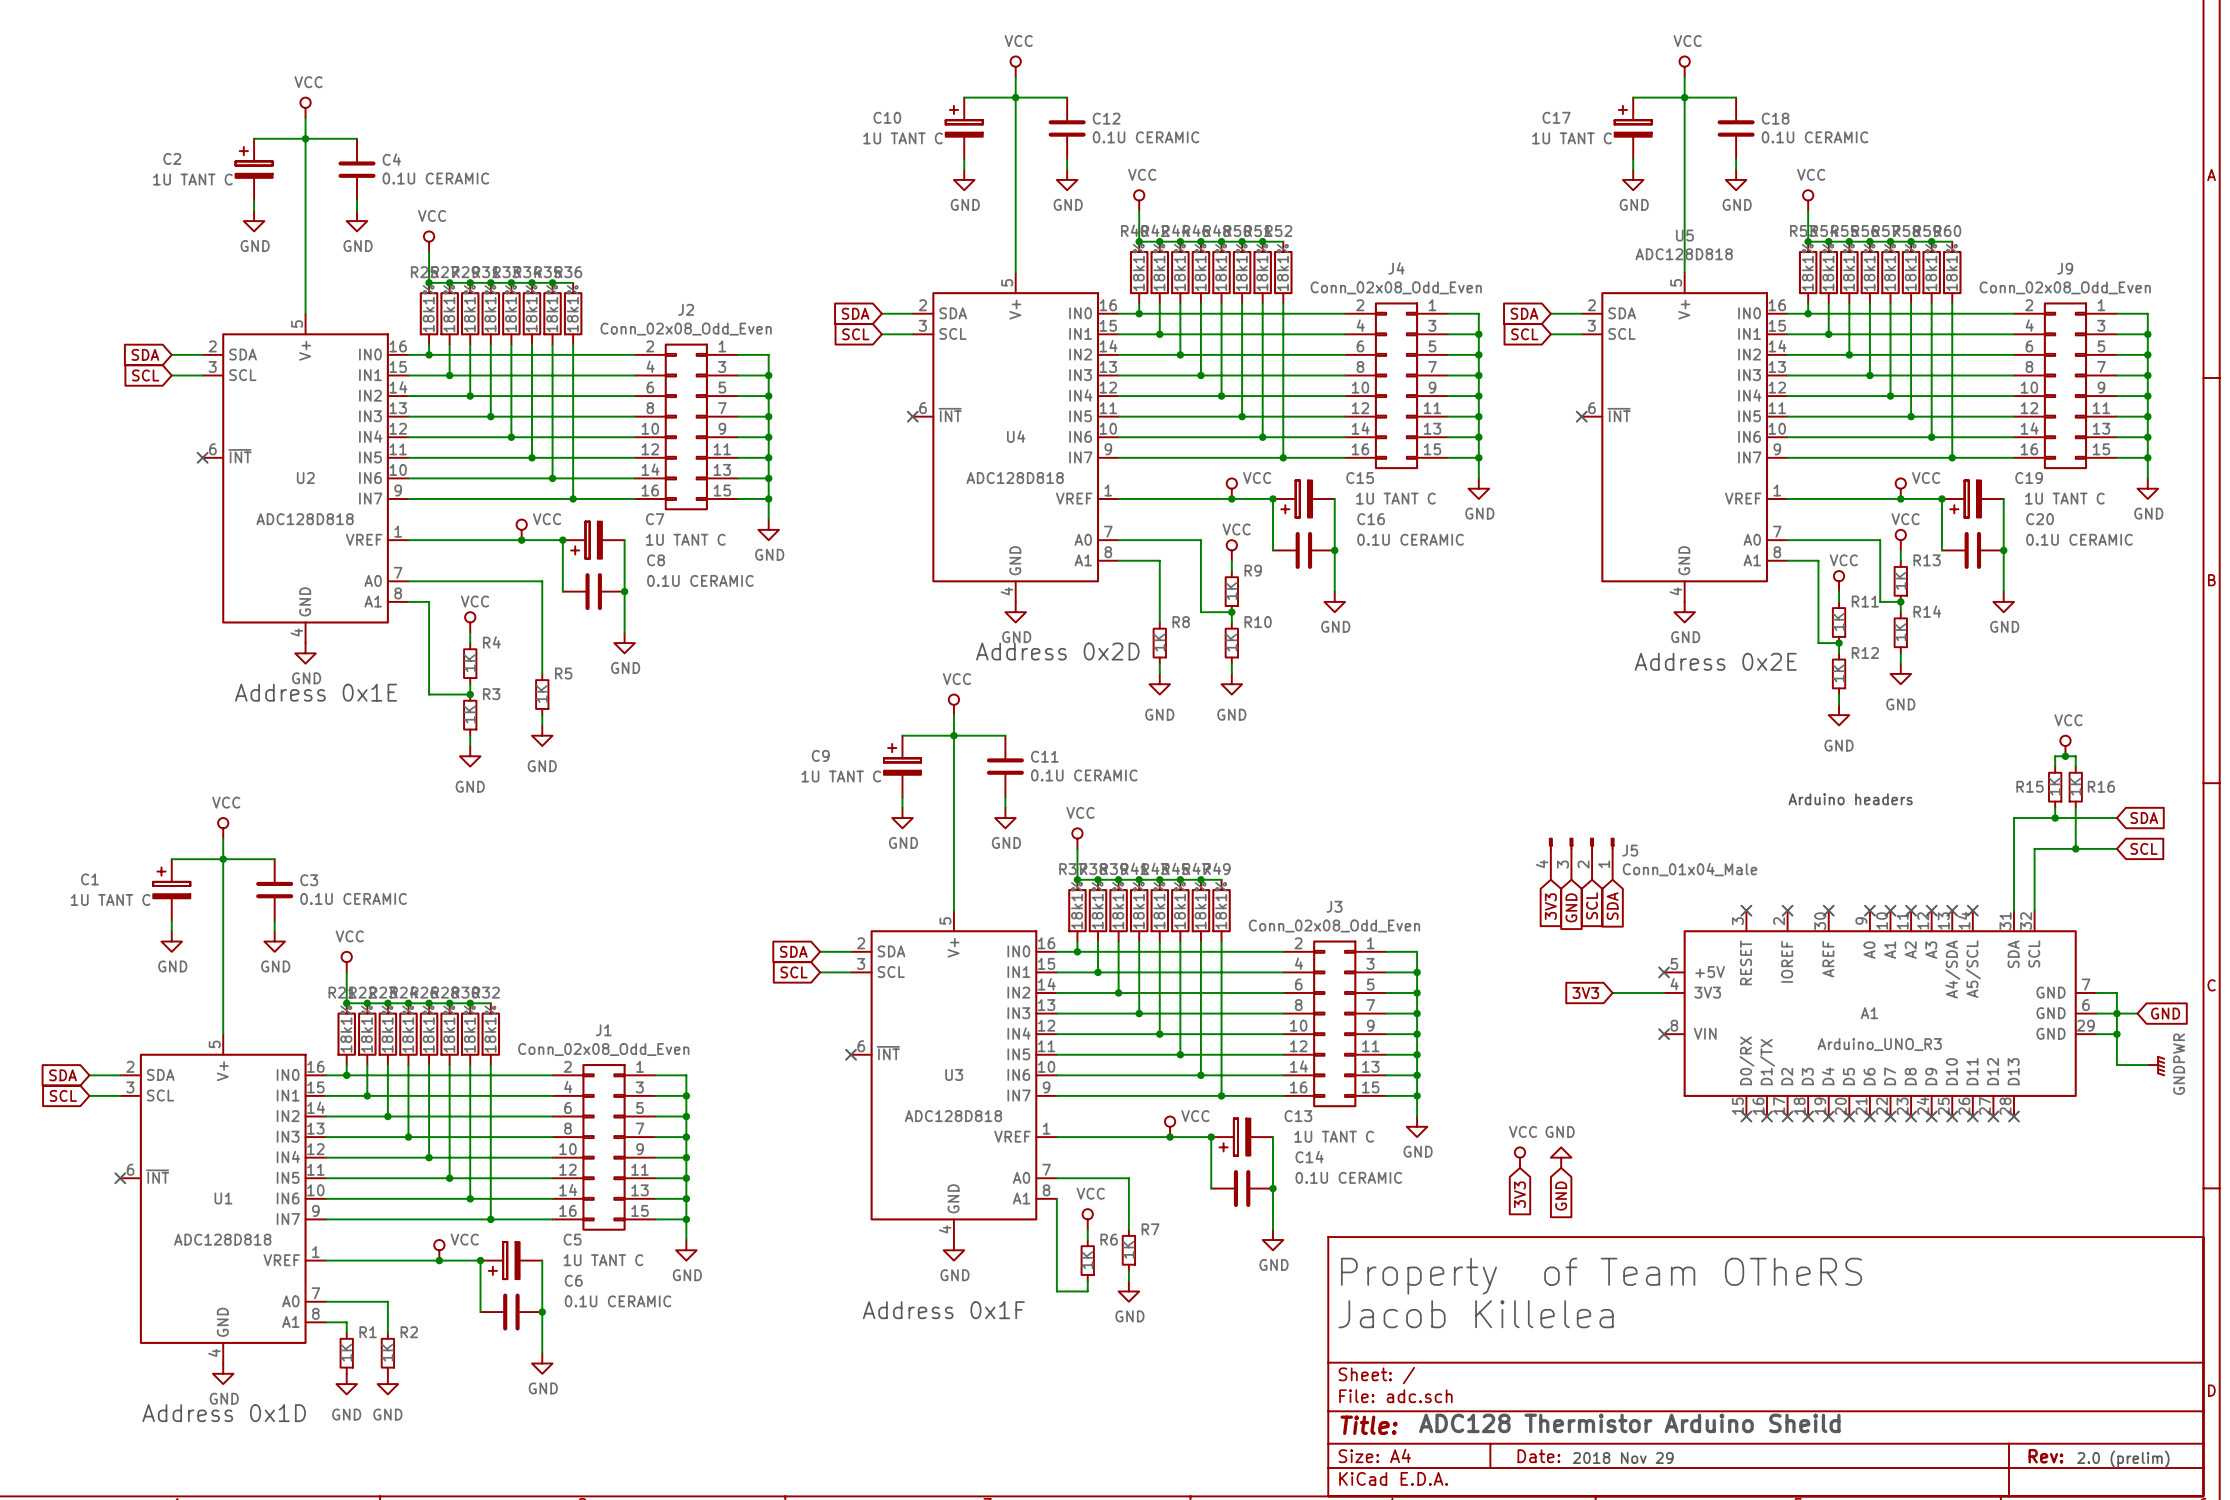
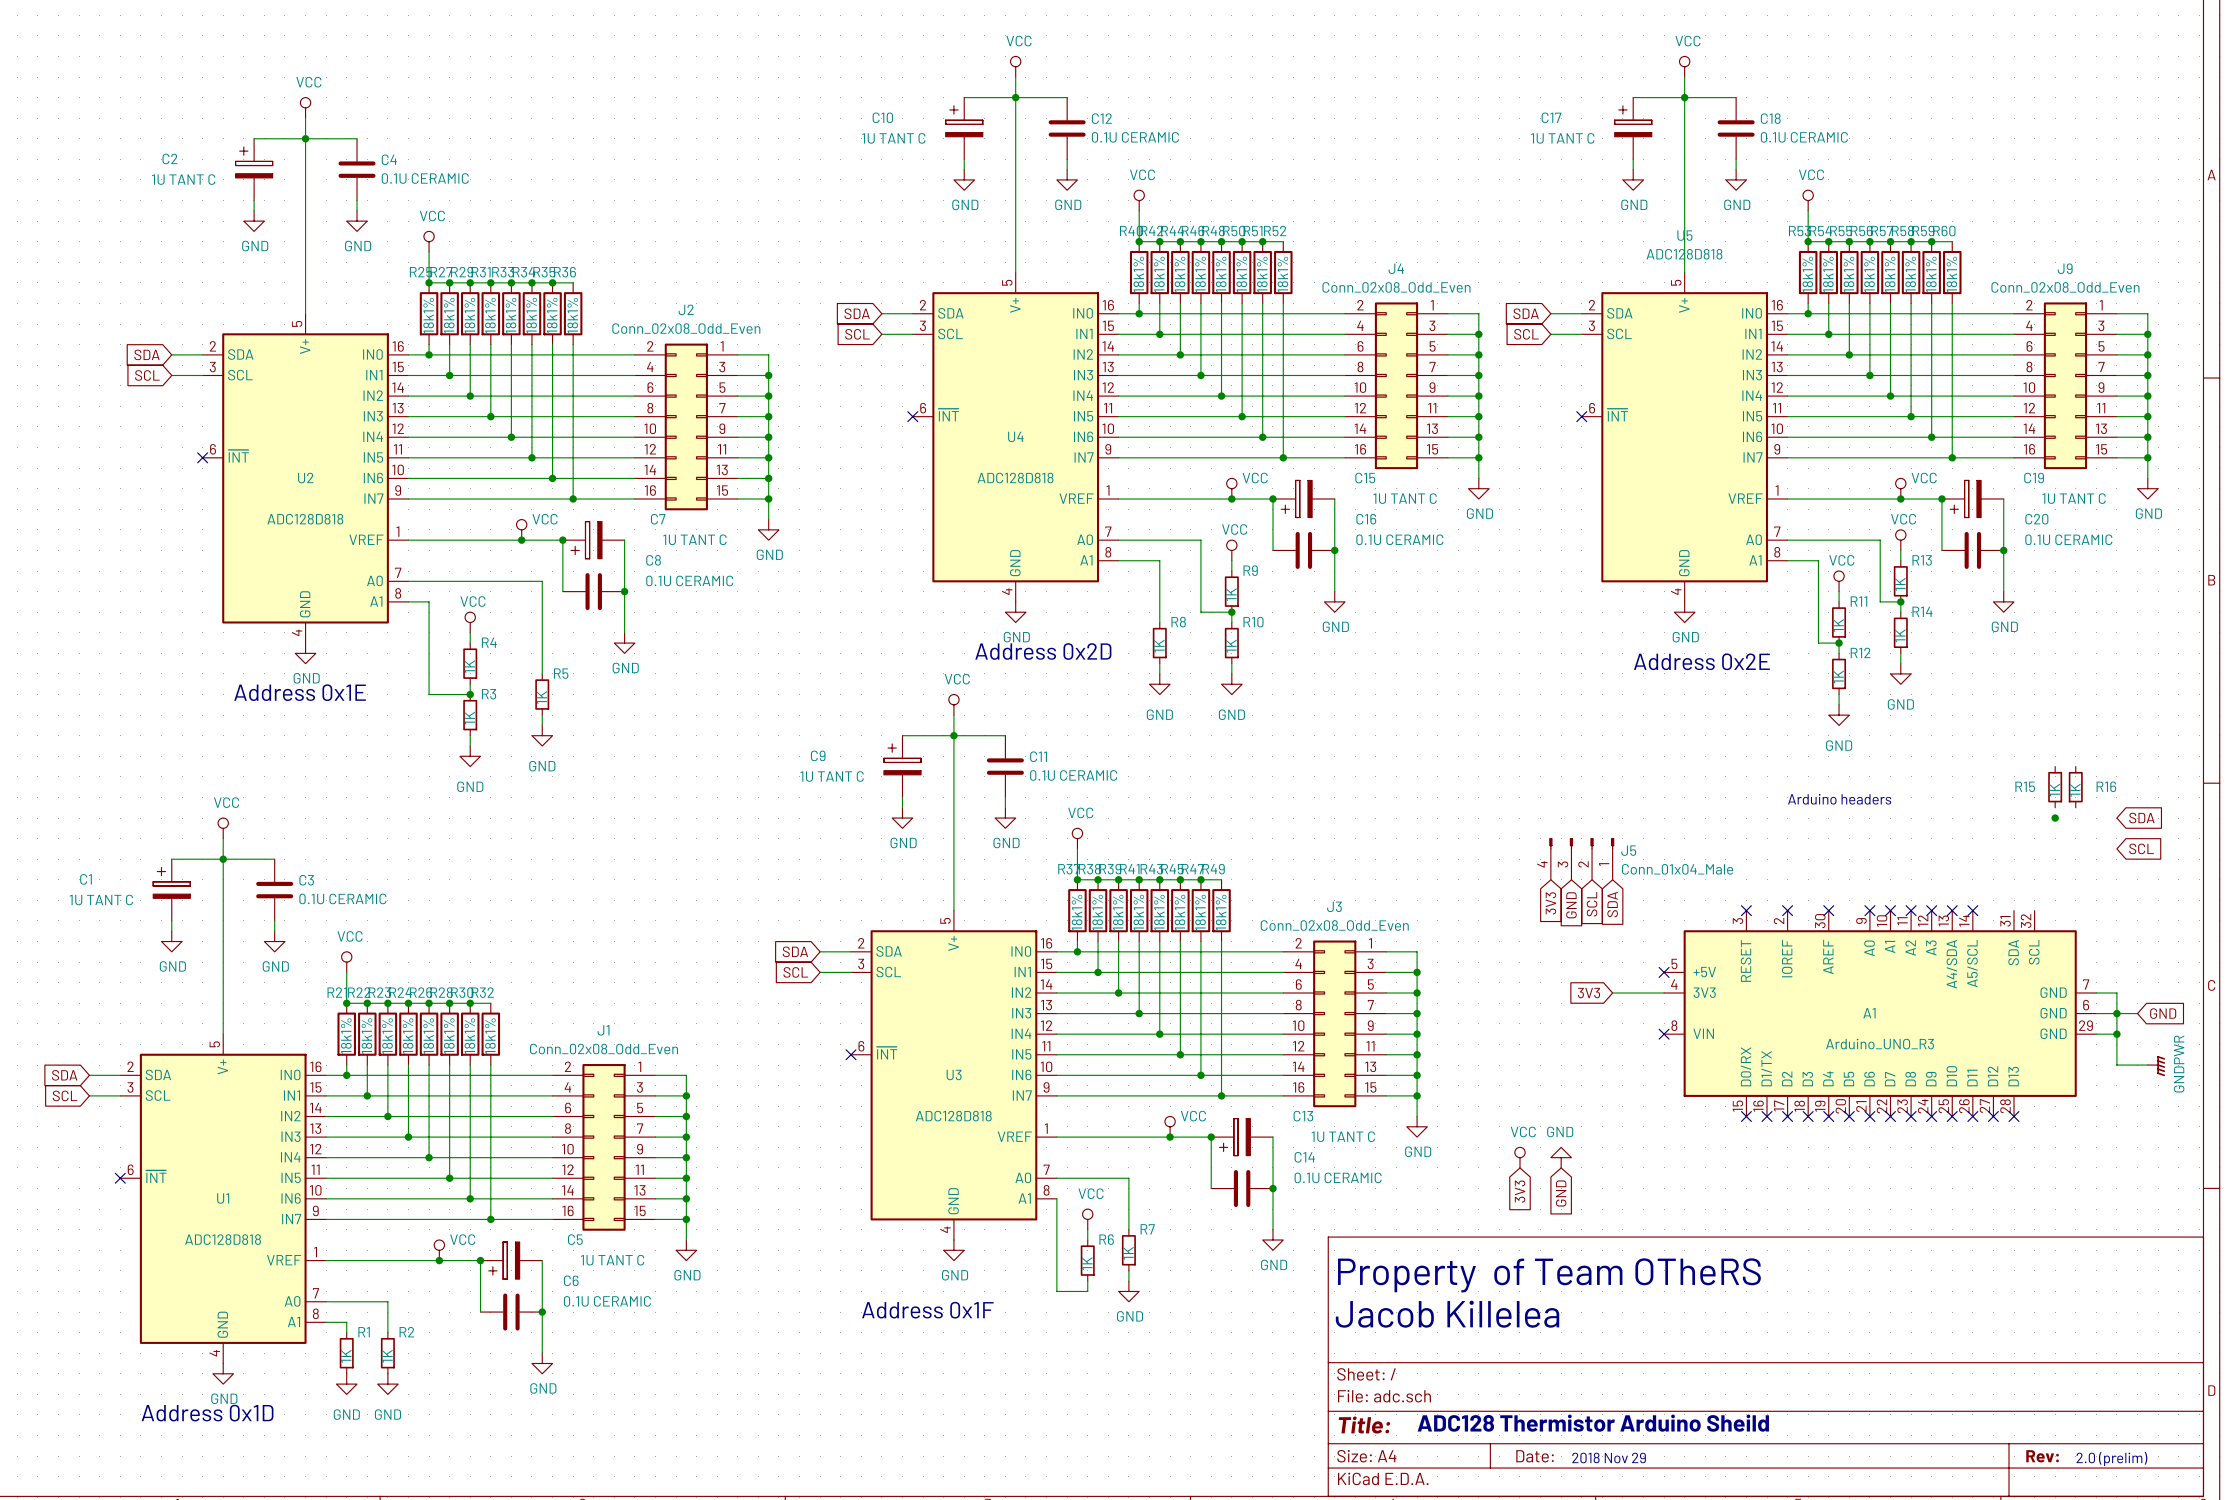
power symbol: VCC (2065, 745) -> none
junction: (2065, 756) -> none
wire: (2055, 766) (2055, 756) (2075, 756) (2075, 766) -> none
wire: (2055, 807) (2055, 818) -> none
wire: (2075, 807) (2075, 848) -> none
wire: (2116, 818) (2014, 818) (2014, 910) -> none
junction: (2075, 848) -> none
wire: (2116, 848) (2034, 848) (2034, 910) -> none

